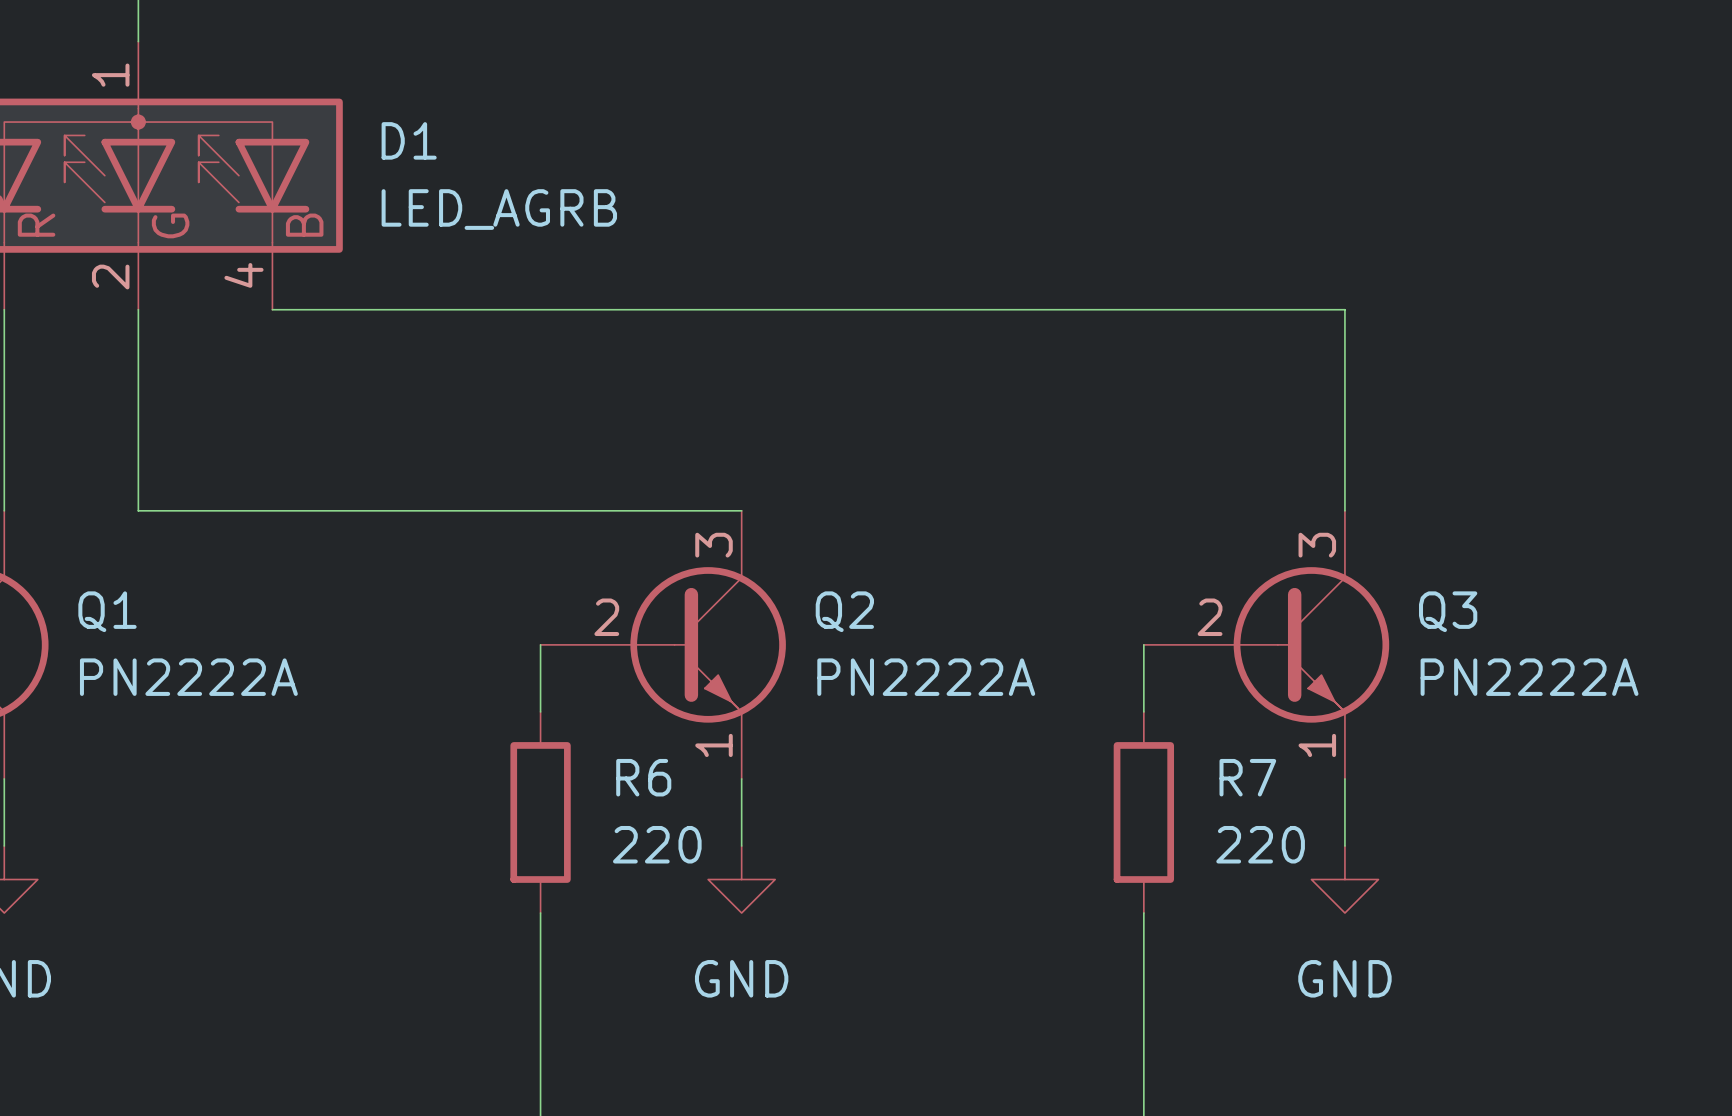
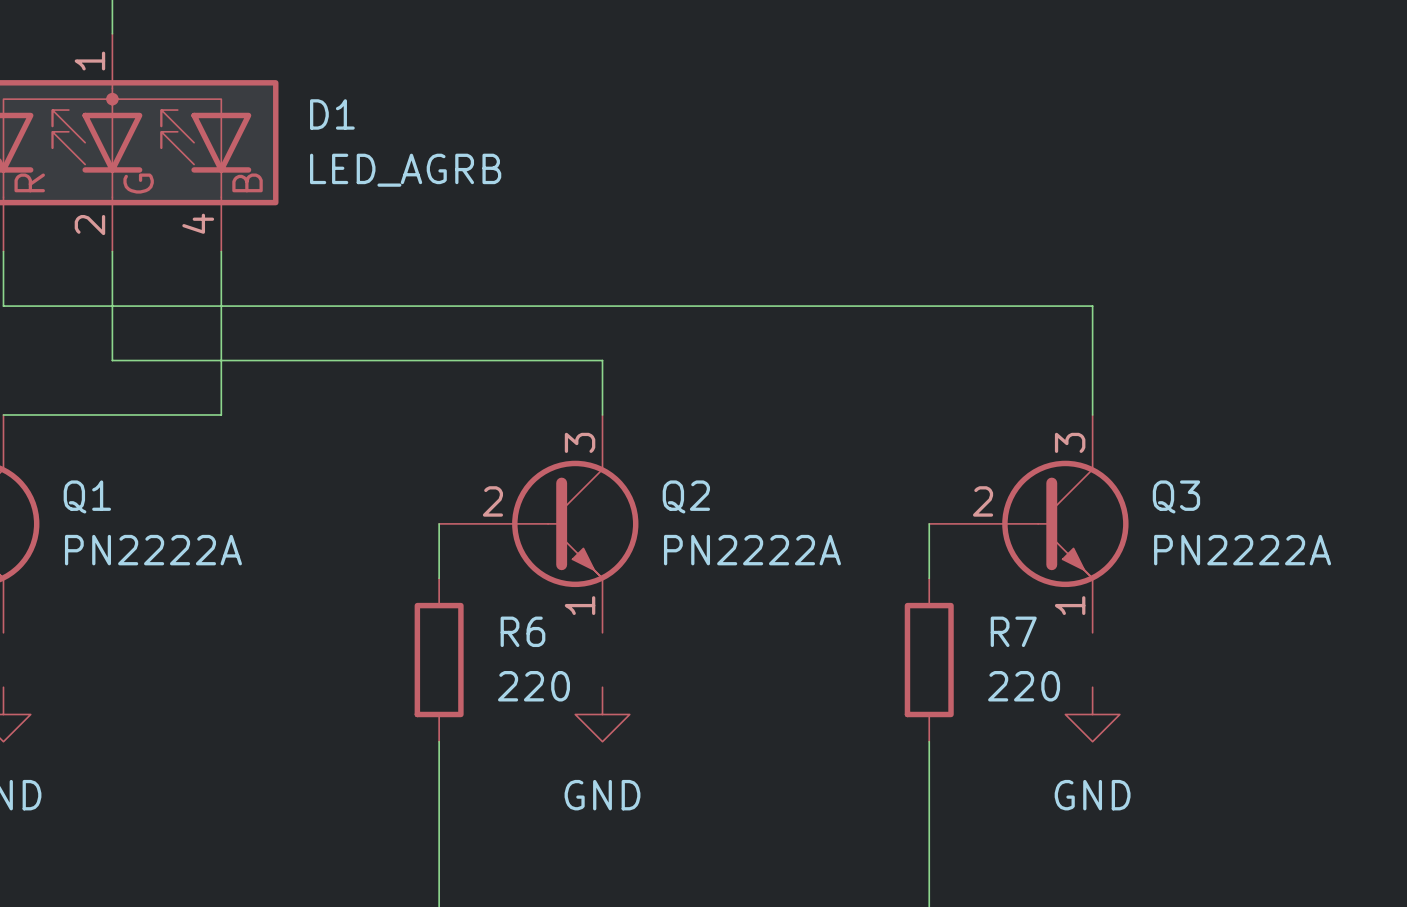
wire: (272, 309) (1344, 309) (1344, 376) -> (3, 306) (1092, 306)
wire: none -> (221, 251) (221, 414)
wire: (4, 376) (4, 510) -> none
wire: (138, 443) (138, 510) -> (3, 414) (112, 414)
wire: (272, 510) (741, 510) -> (112, 360) (602, 360) (602, 414)
wire: (4, 778) (4, 845) -> none
wire: (741, 778) (741, 845) -> none
wire: (1344, 778) (1344, 845) -> none

